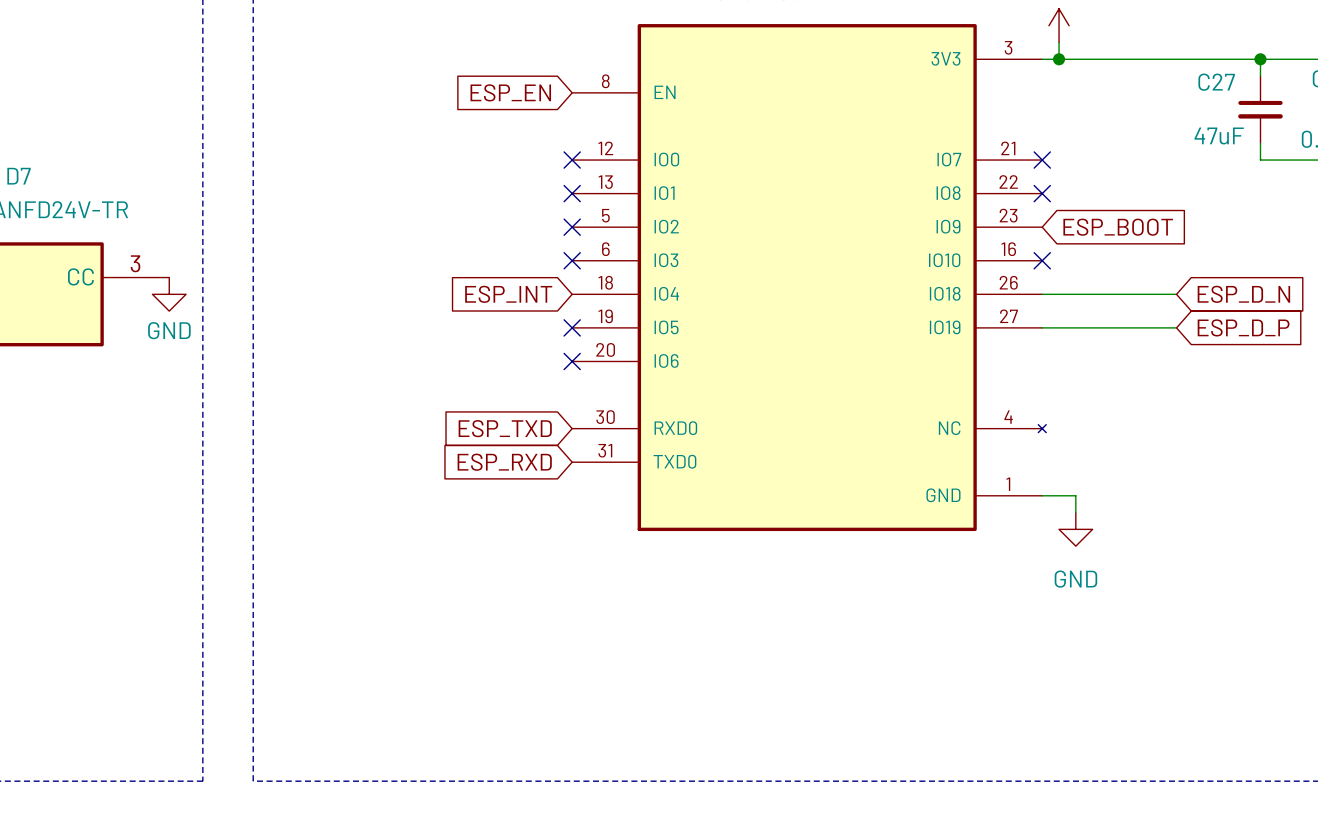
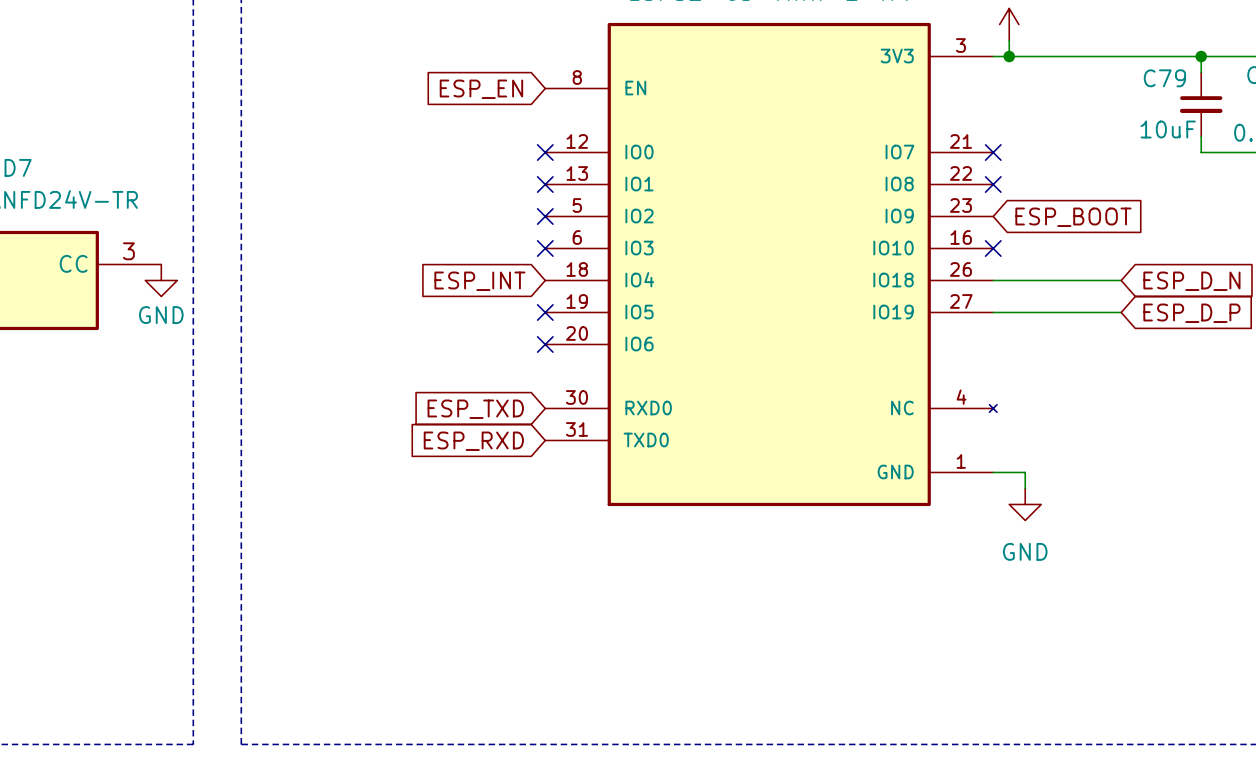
C27 name: C27 (1216, 82) -> C79 (1164, 78)
C27 value: 47uF (1219, 135) -> 10uF (1168, 129)

